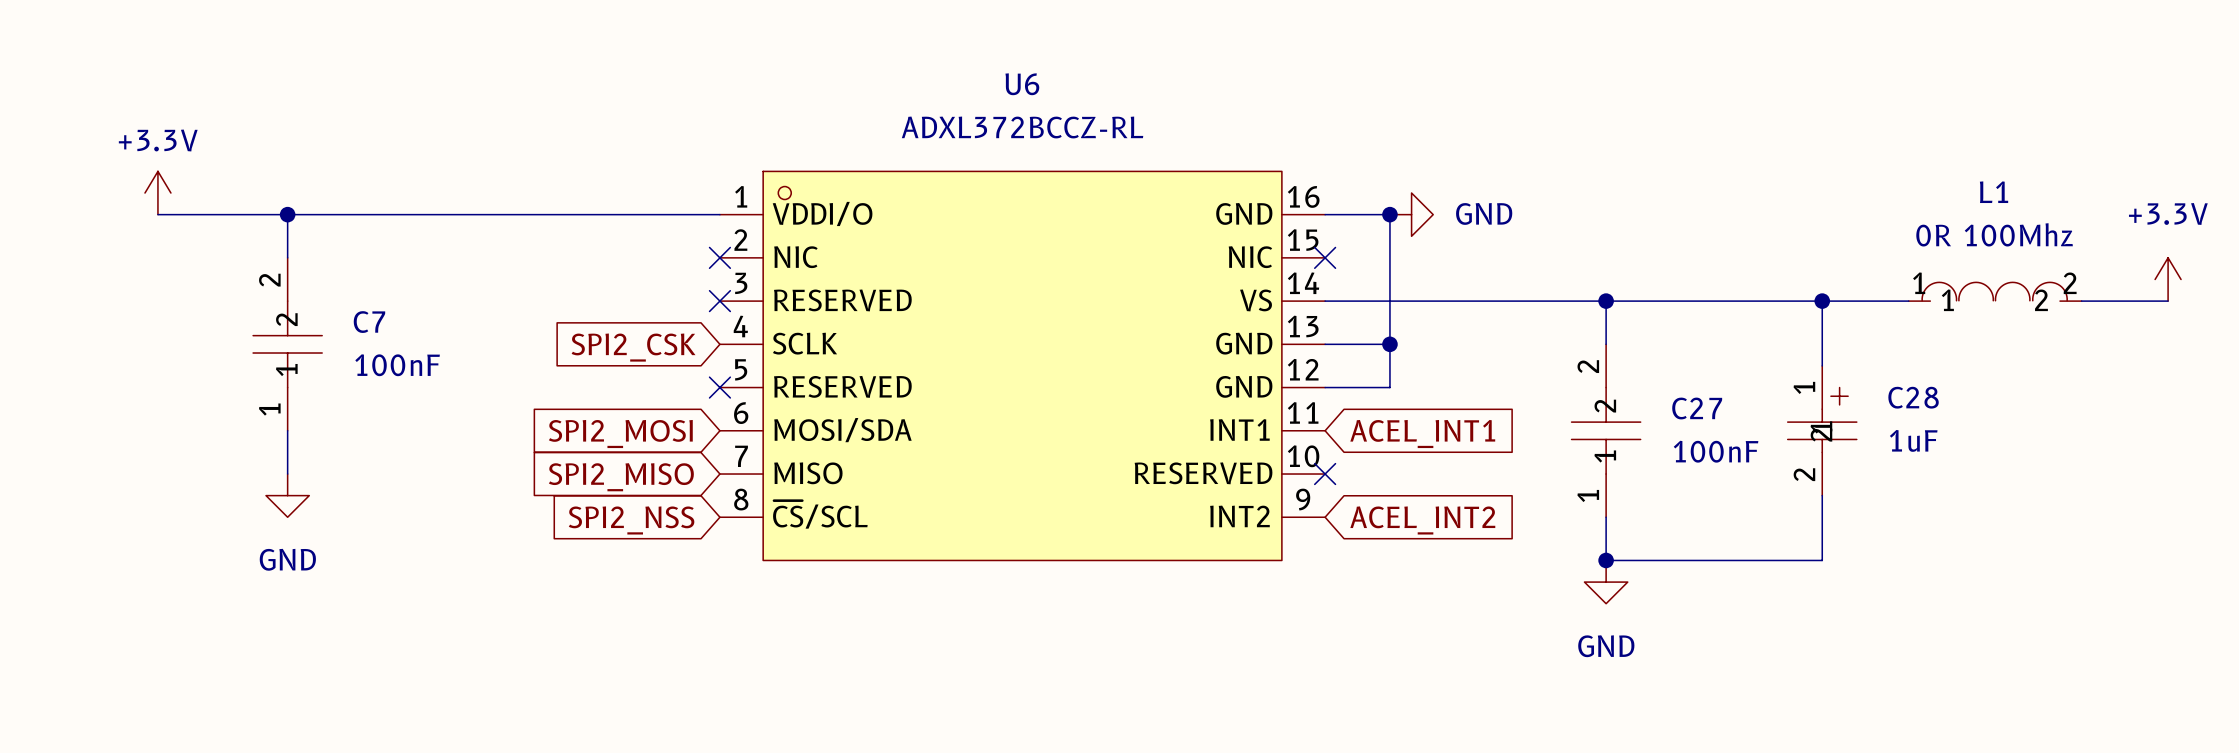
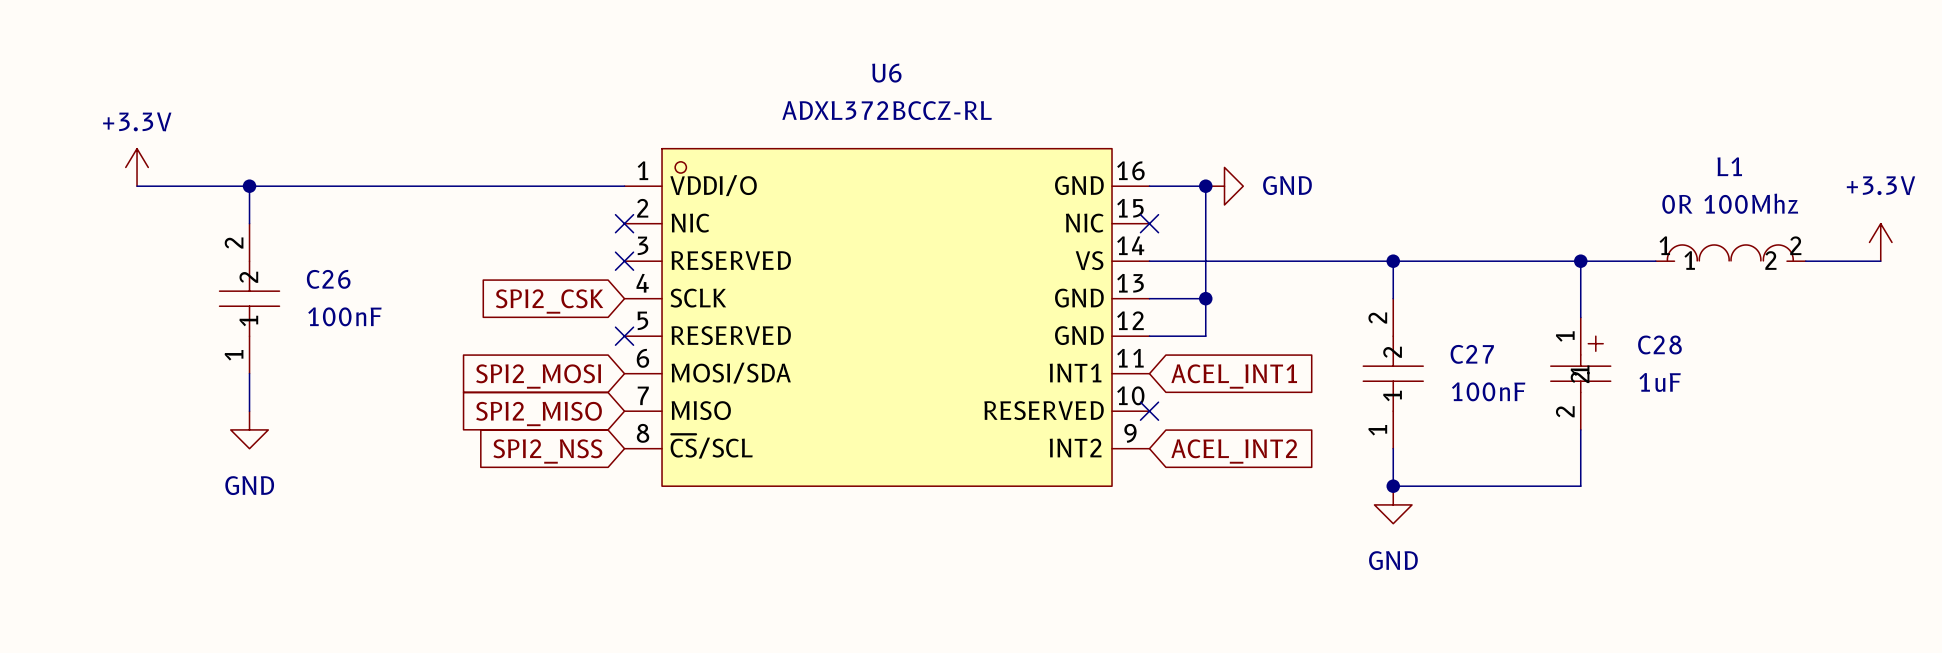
C7 name: C7 (369, 322) -> C26 (328, 279)

